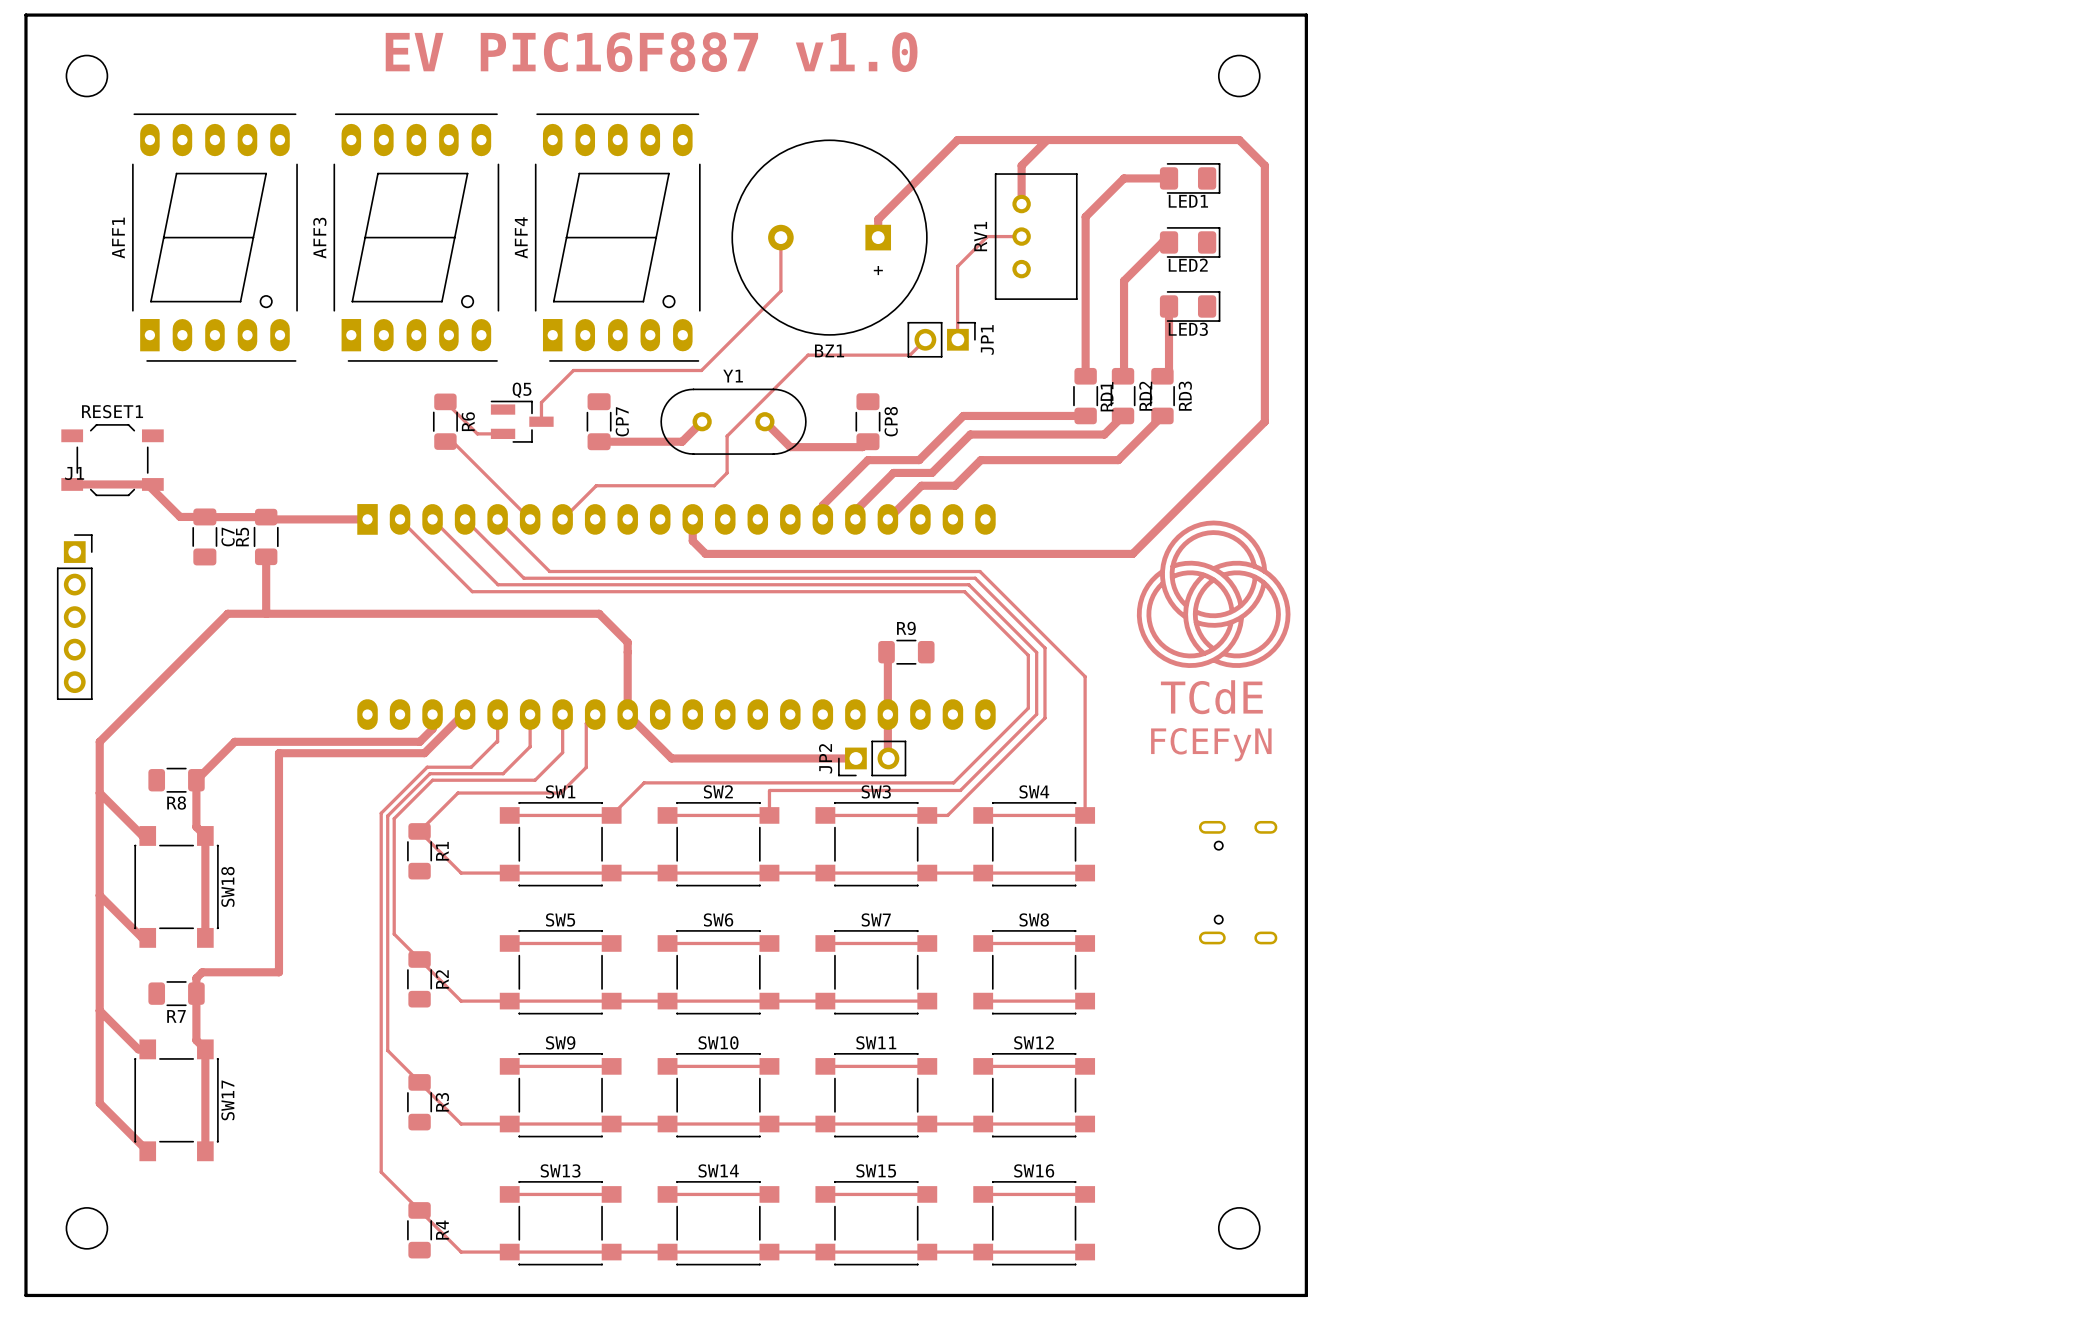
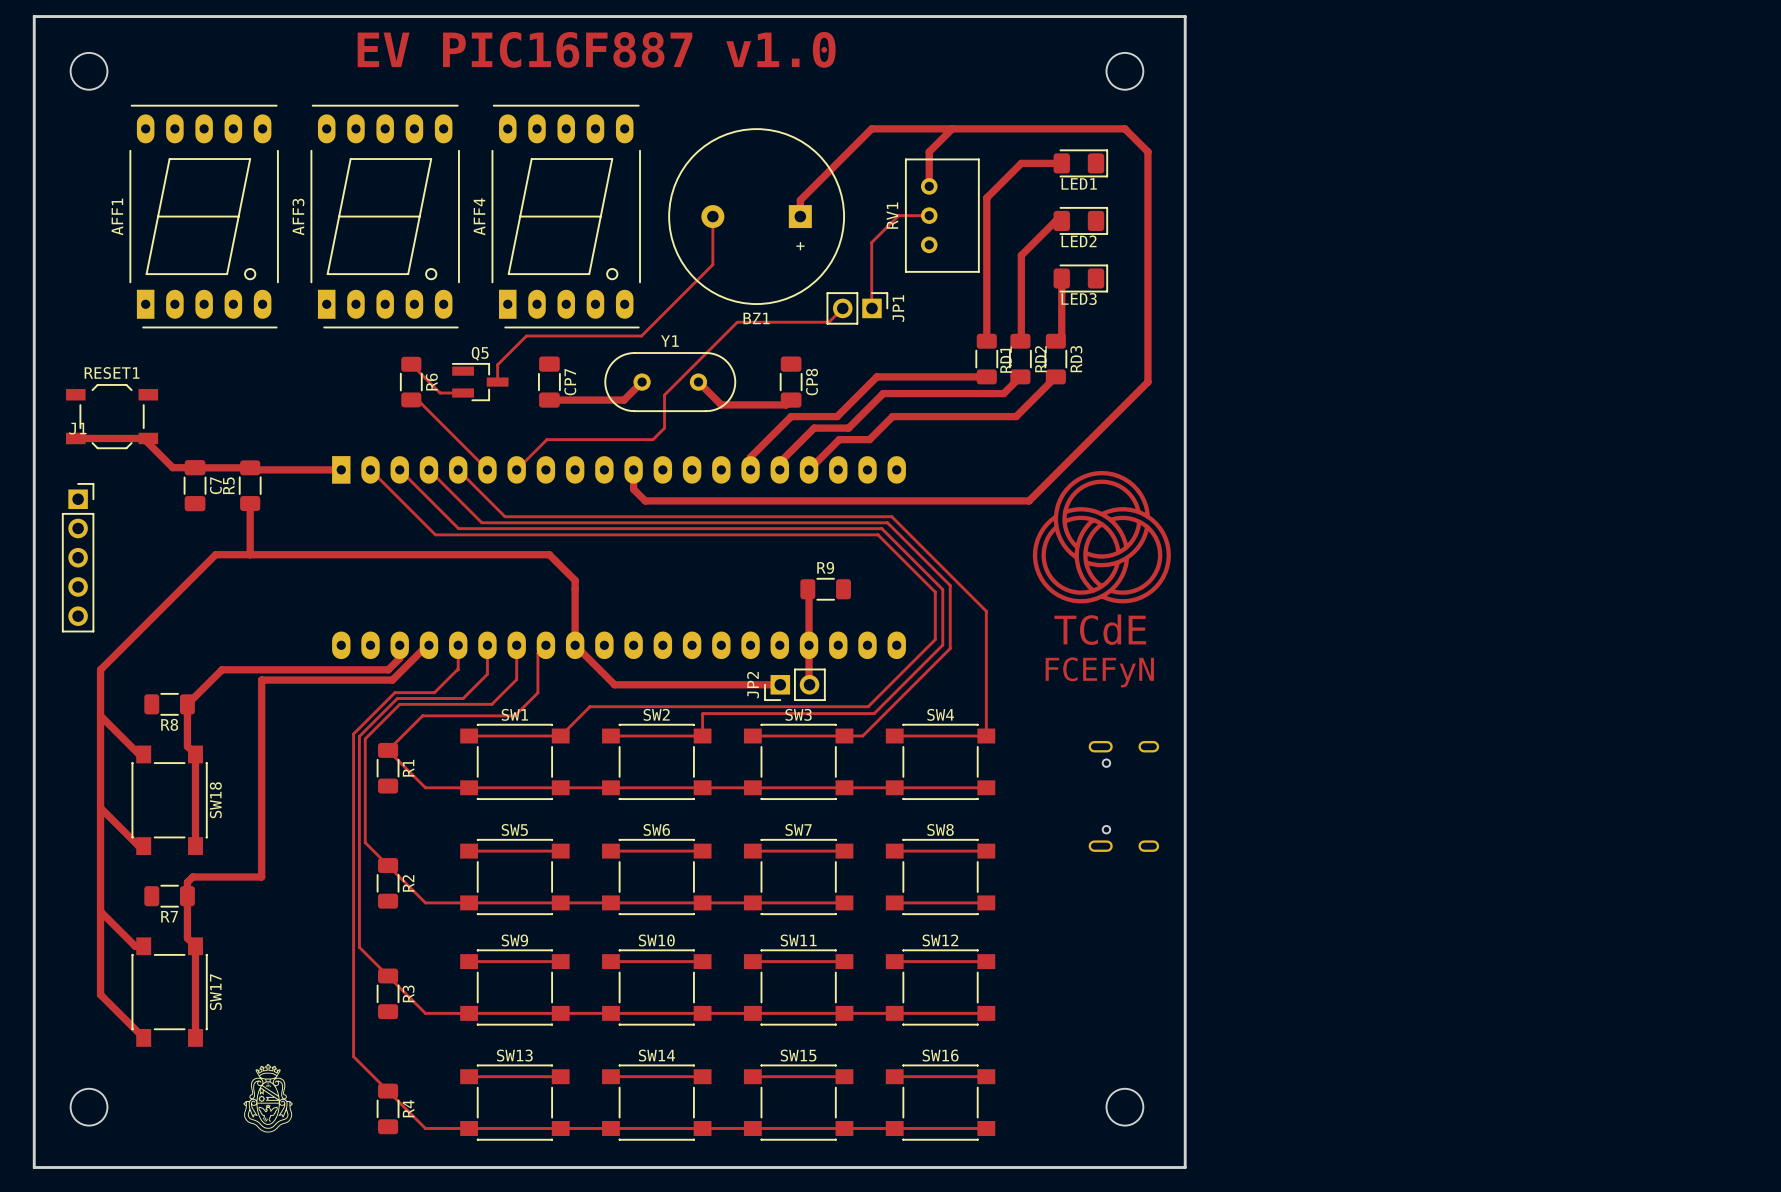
drawing: none -> [243, 1063, 293, 1133]

